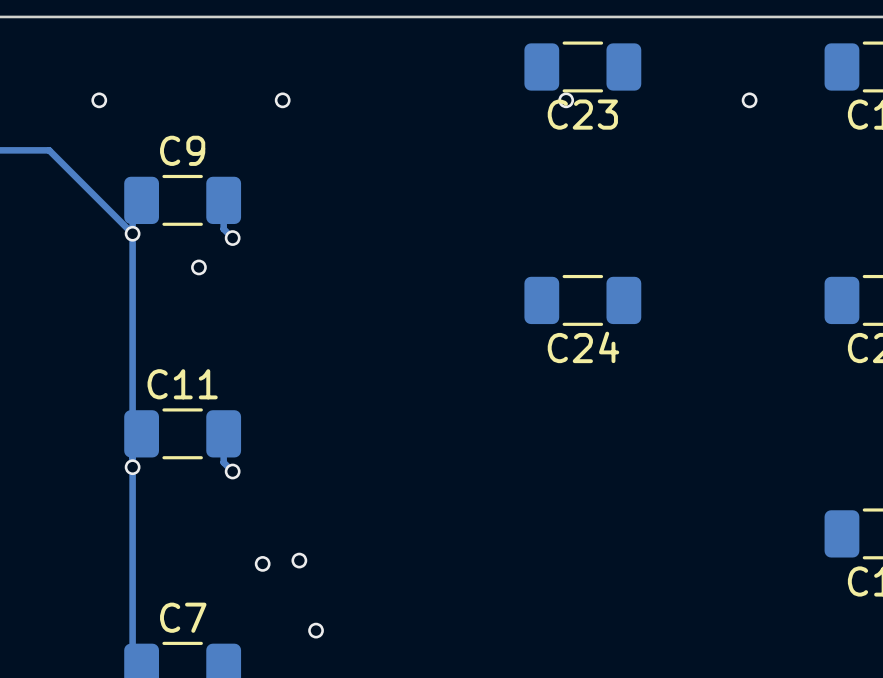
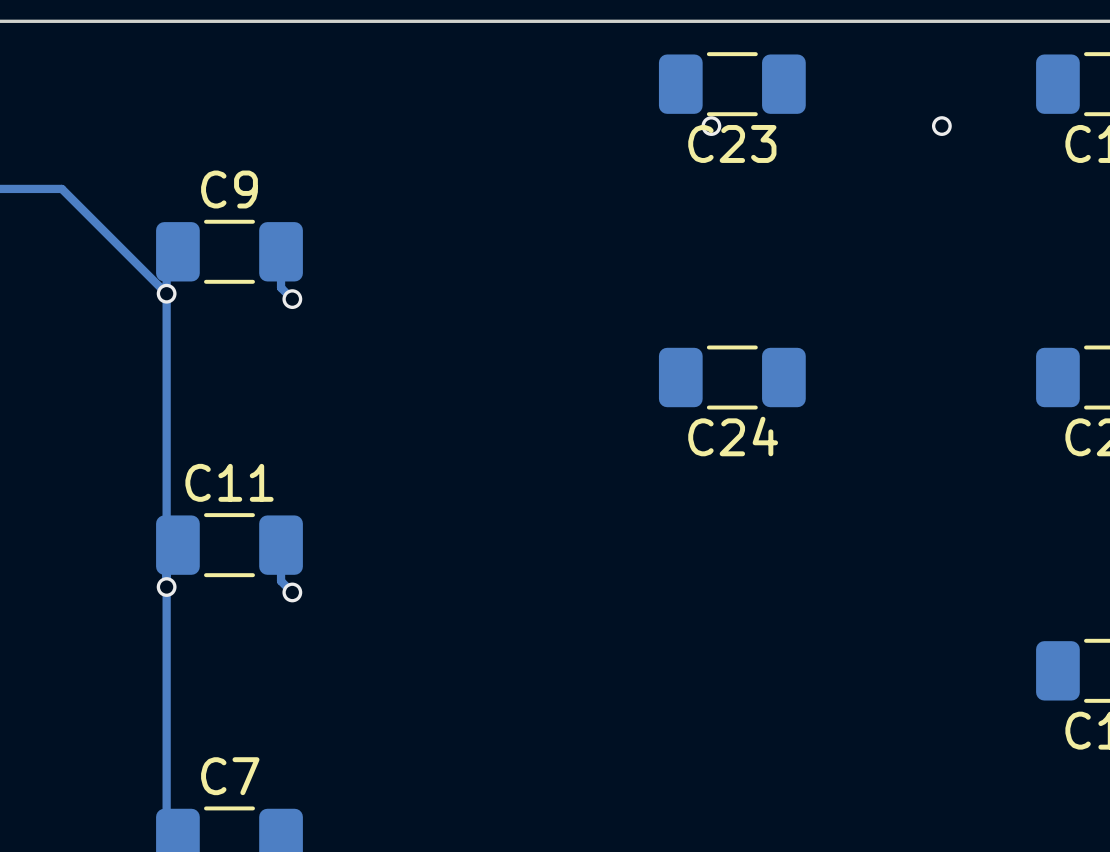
via: (99, 100) -> none
via: (282, 100) -> none
via: (198, 267) -> none
via: (299, 560) -> none
via: (262, 563) -> none
via: (316, 630) -> none

